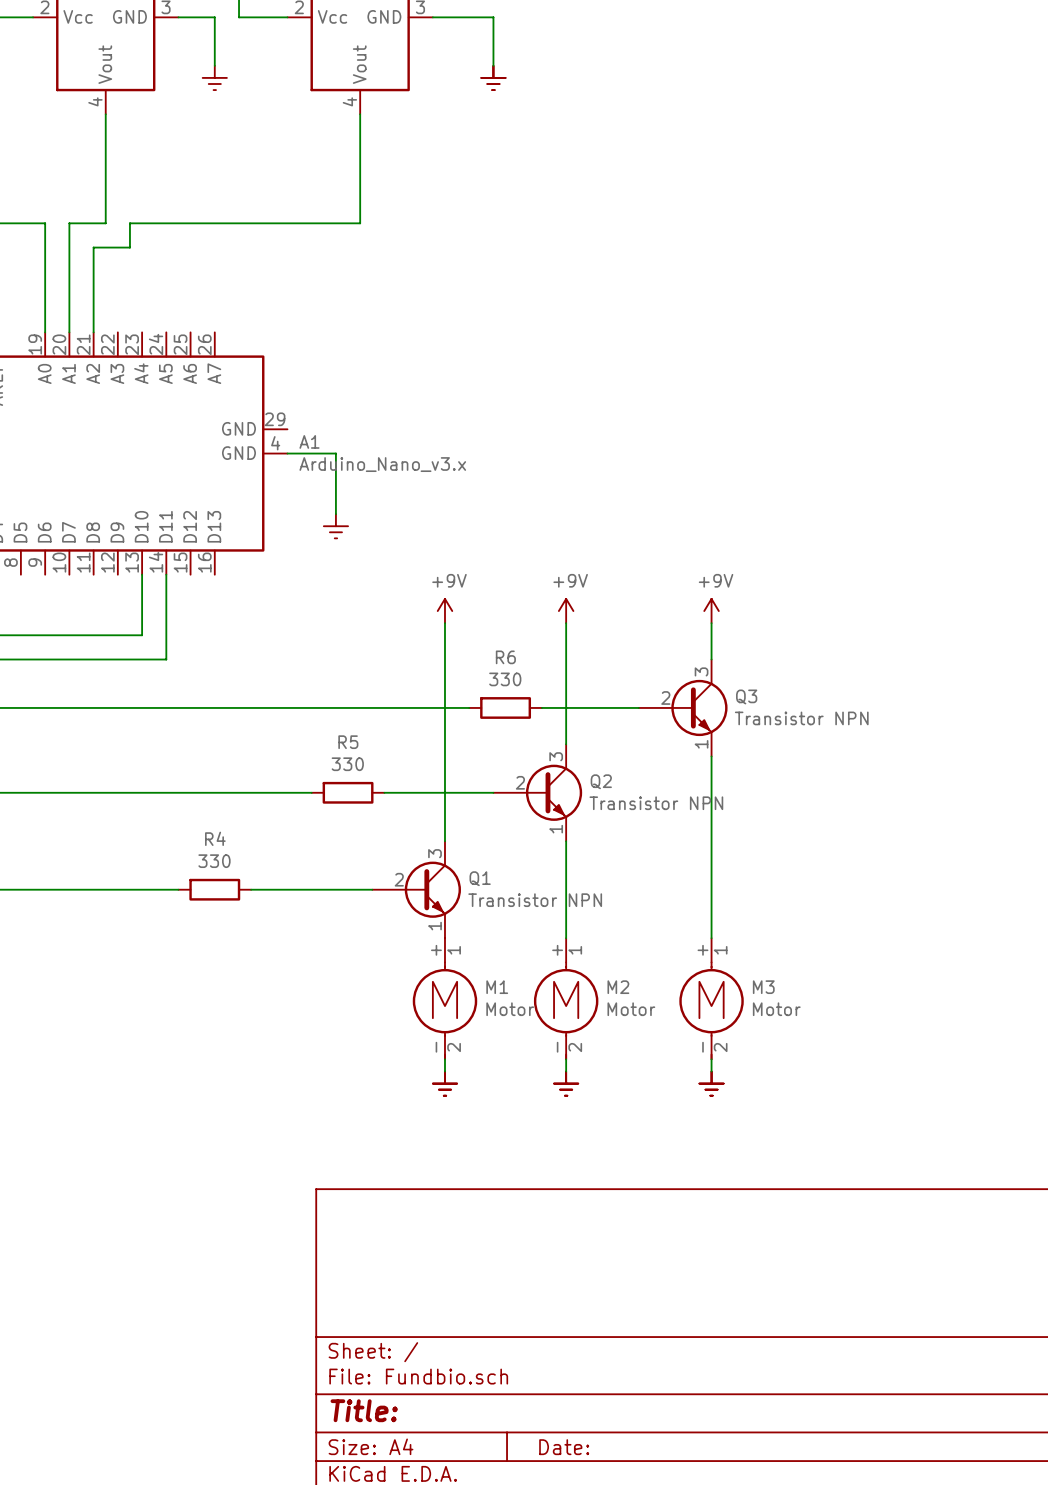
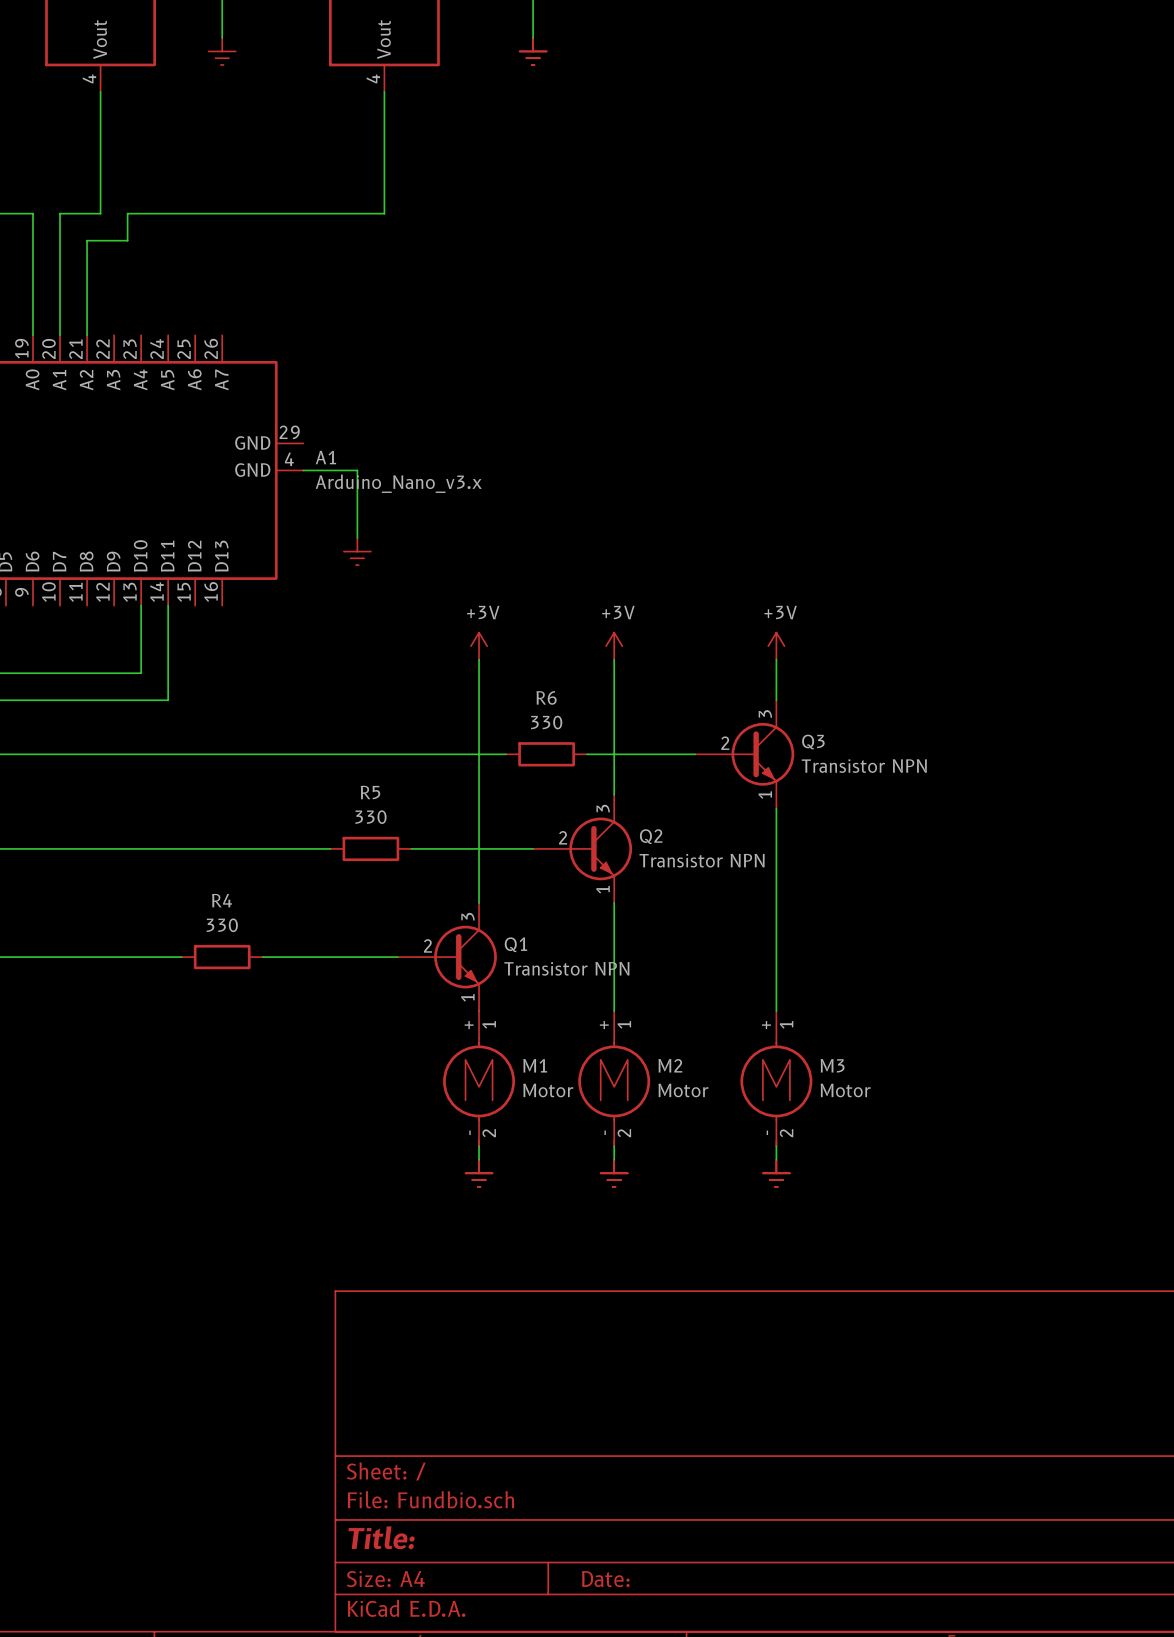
power symbol: +9V (444, 611) -> +3V (479, 646)
power symbol: +9V (566, 611) -> +3V (614, 646)
power symbol: +9V (711, 611) -> +3V (776, 646)

